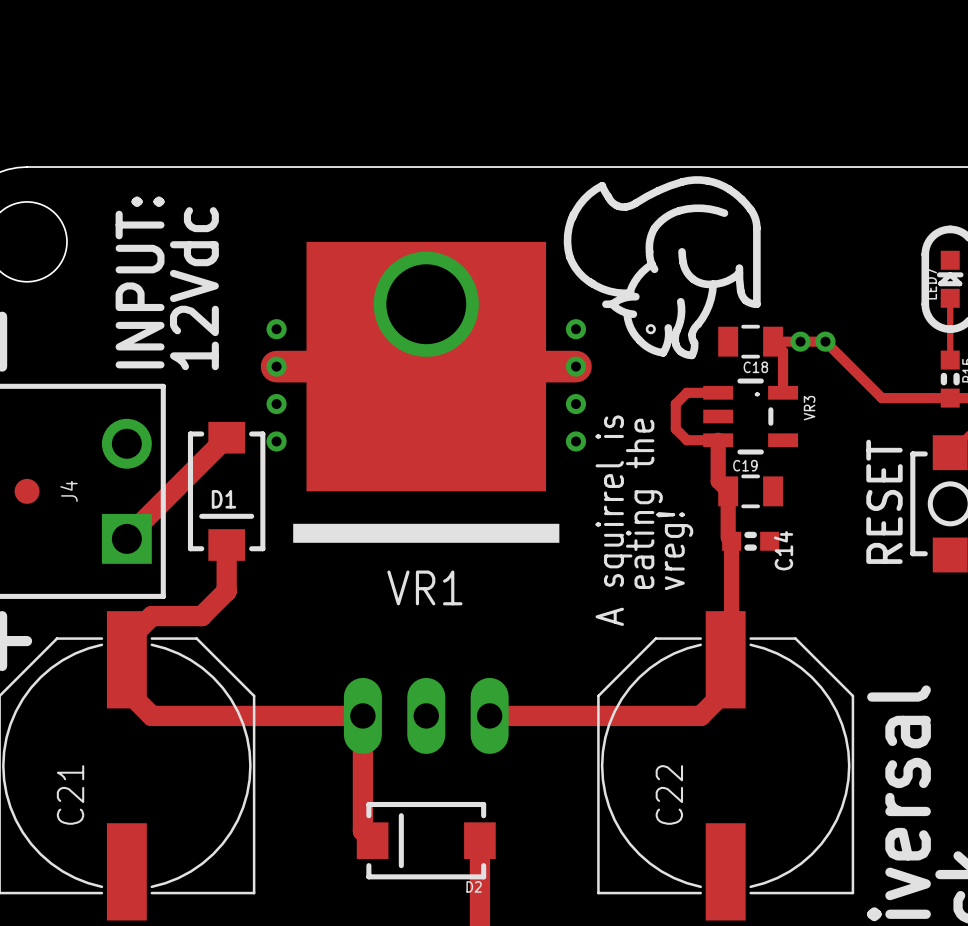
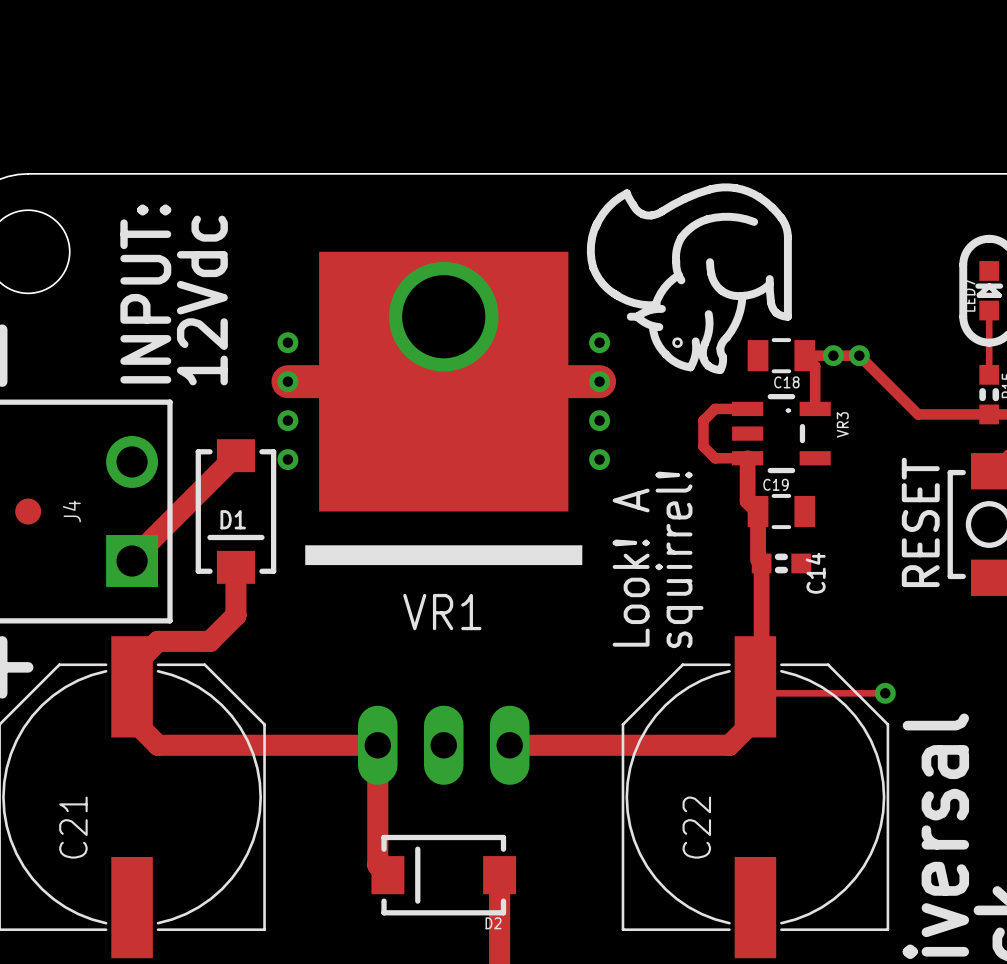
text: eating the (644, 503) -> none
text: A squirrel is (613, 520) -> Look! A (631, 567)
text: none -> squirrel! (679, 559)
text: vreg! (674, 551) -> none
track: none -> (755, 686) (761, 693) (885, 693)
via: none -> (885, 693)

